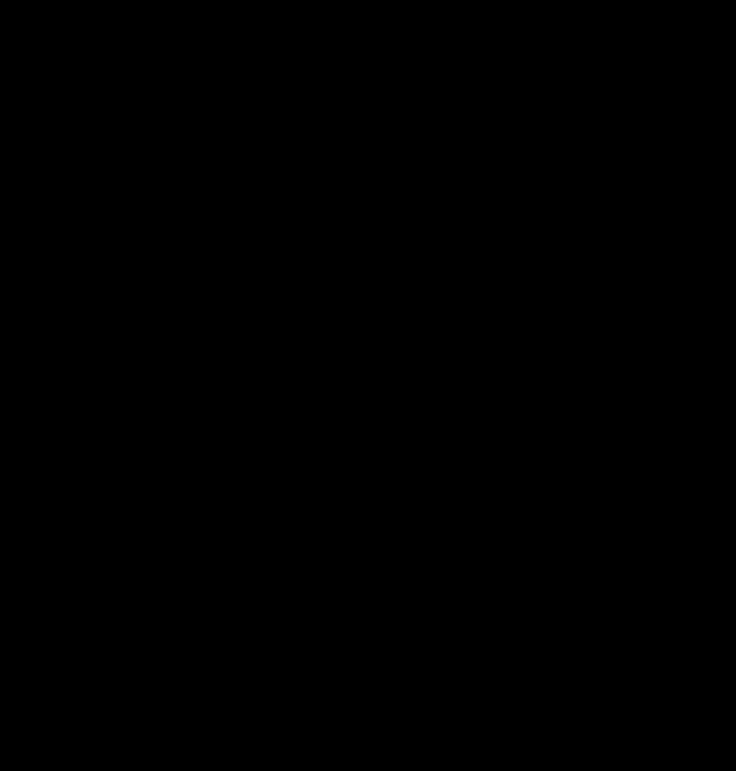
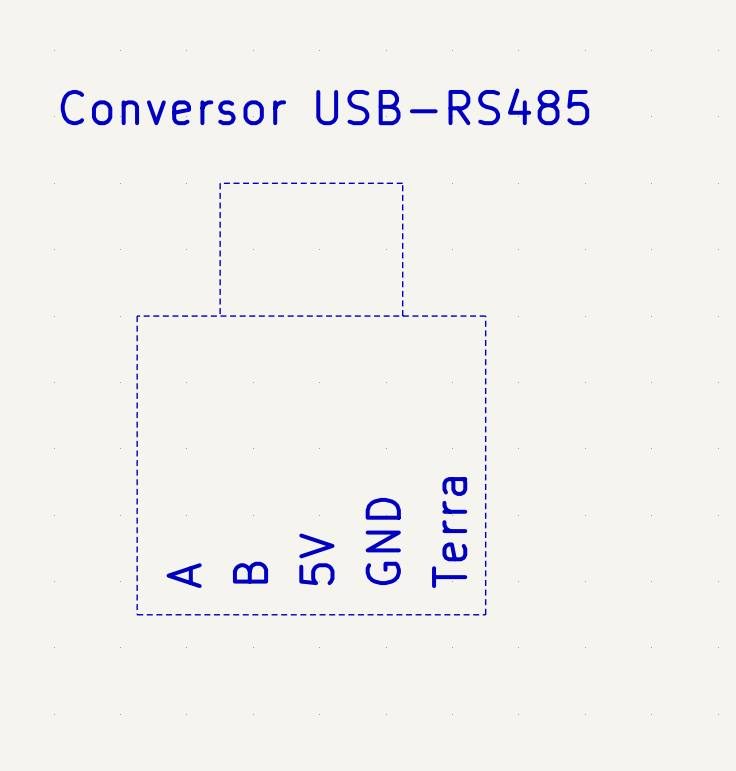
text: none -> Conversor USB-RS485 (324, 106)
line: none -> (137, 316) (485, 316) (485, 614) (137, 614) (137, 316)
line: none -> (220, 316) (220, 183) (402, 183) (402, 316)
text: none -> Terra (449, 532)
text: none -> GND (383, 541)
text: none -> 5V (316, 559)
text: none -> B (250, 572)
text: none -> A (184, 575)

